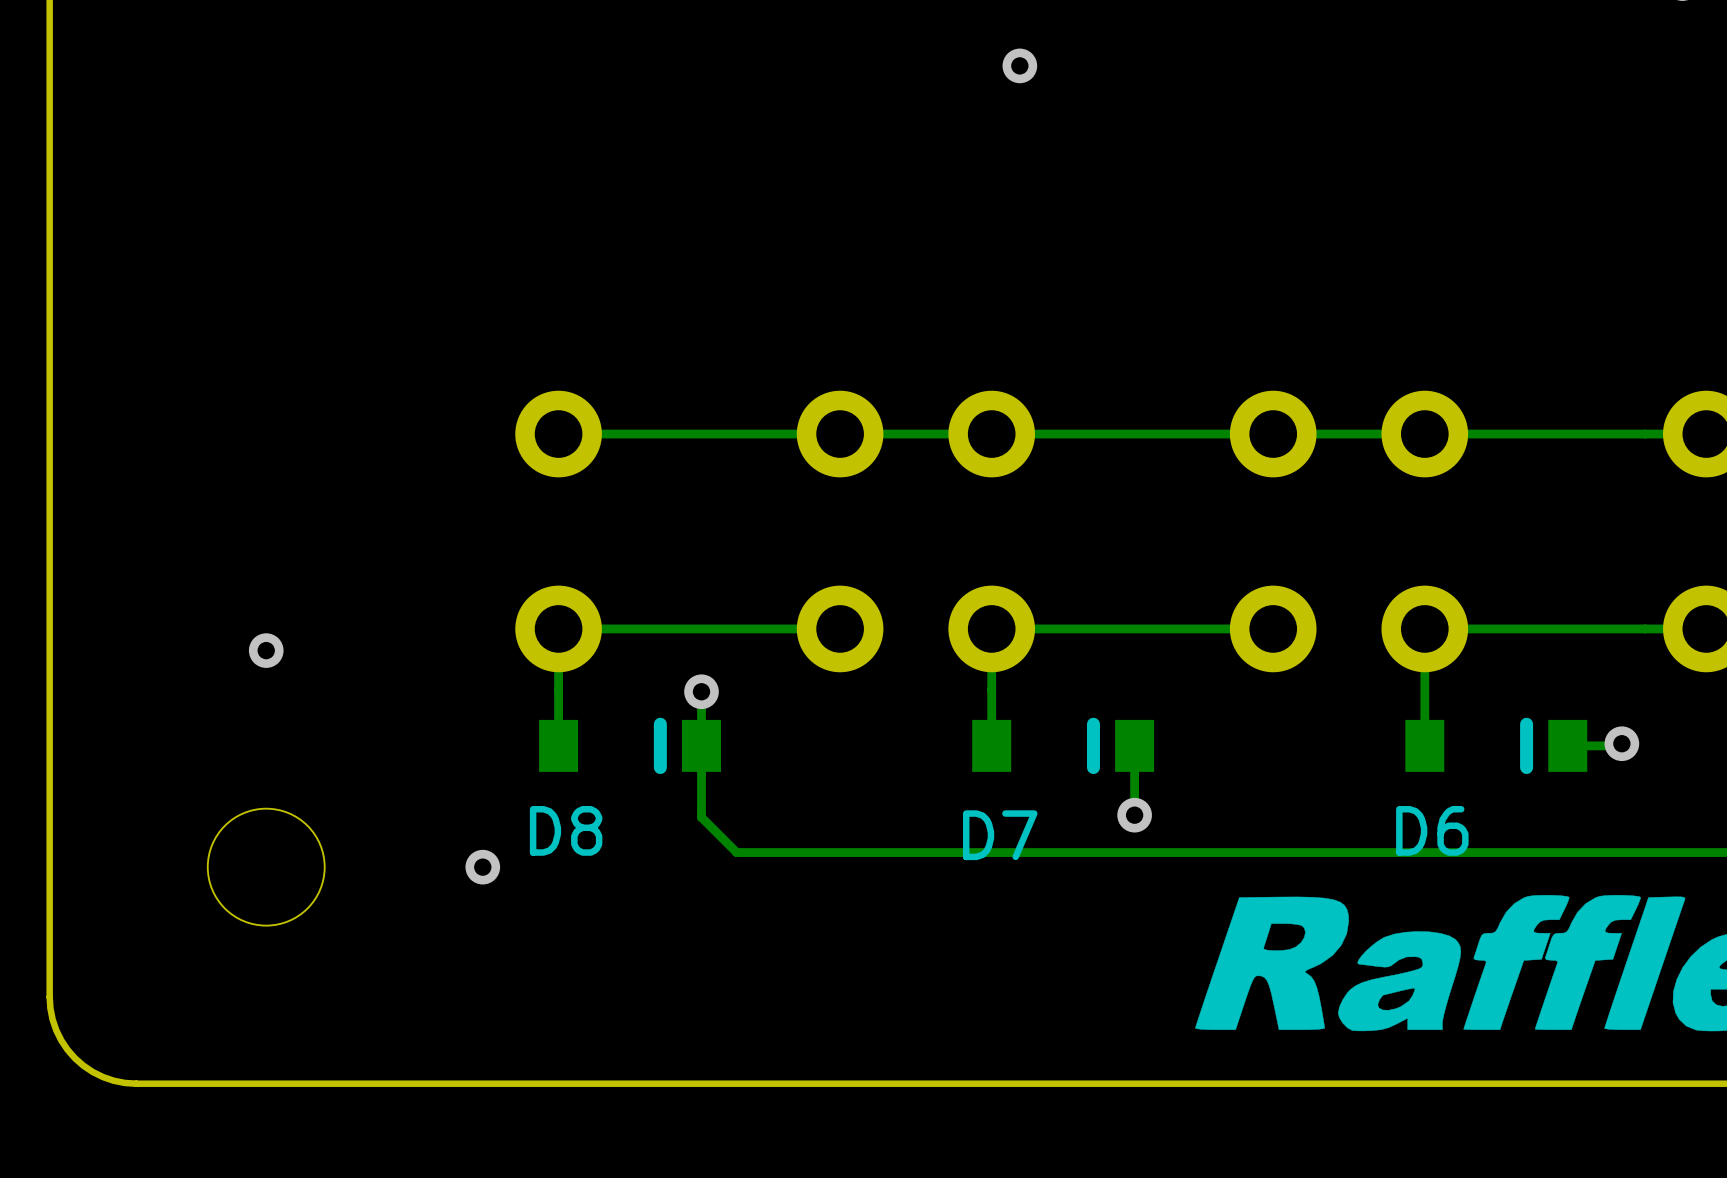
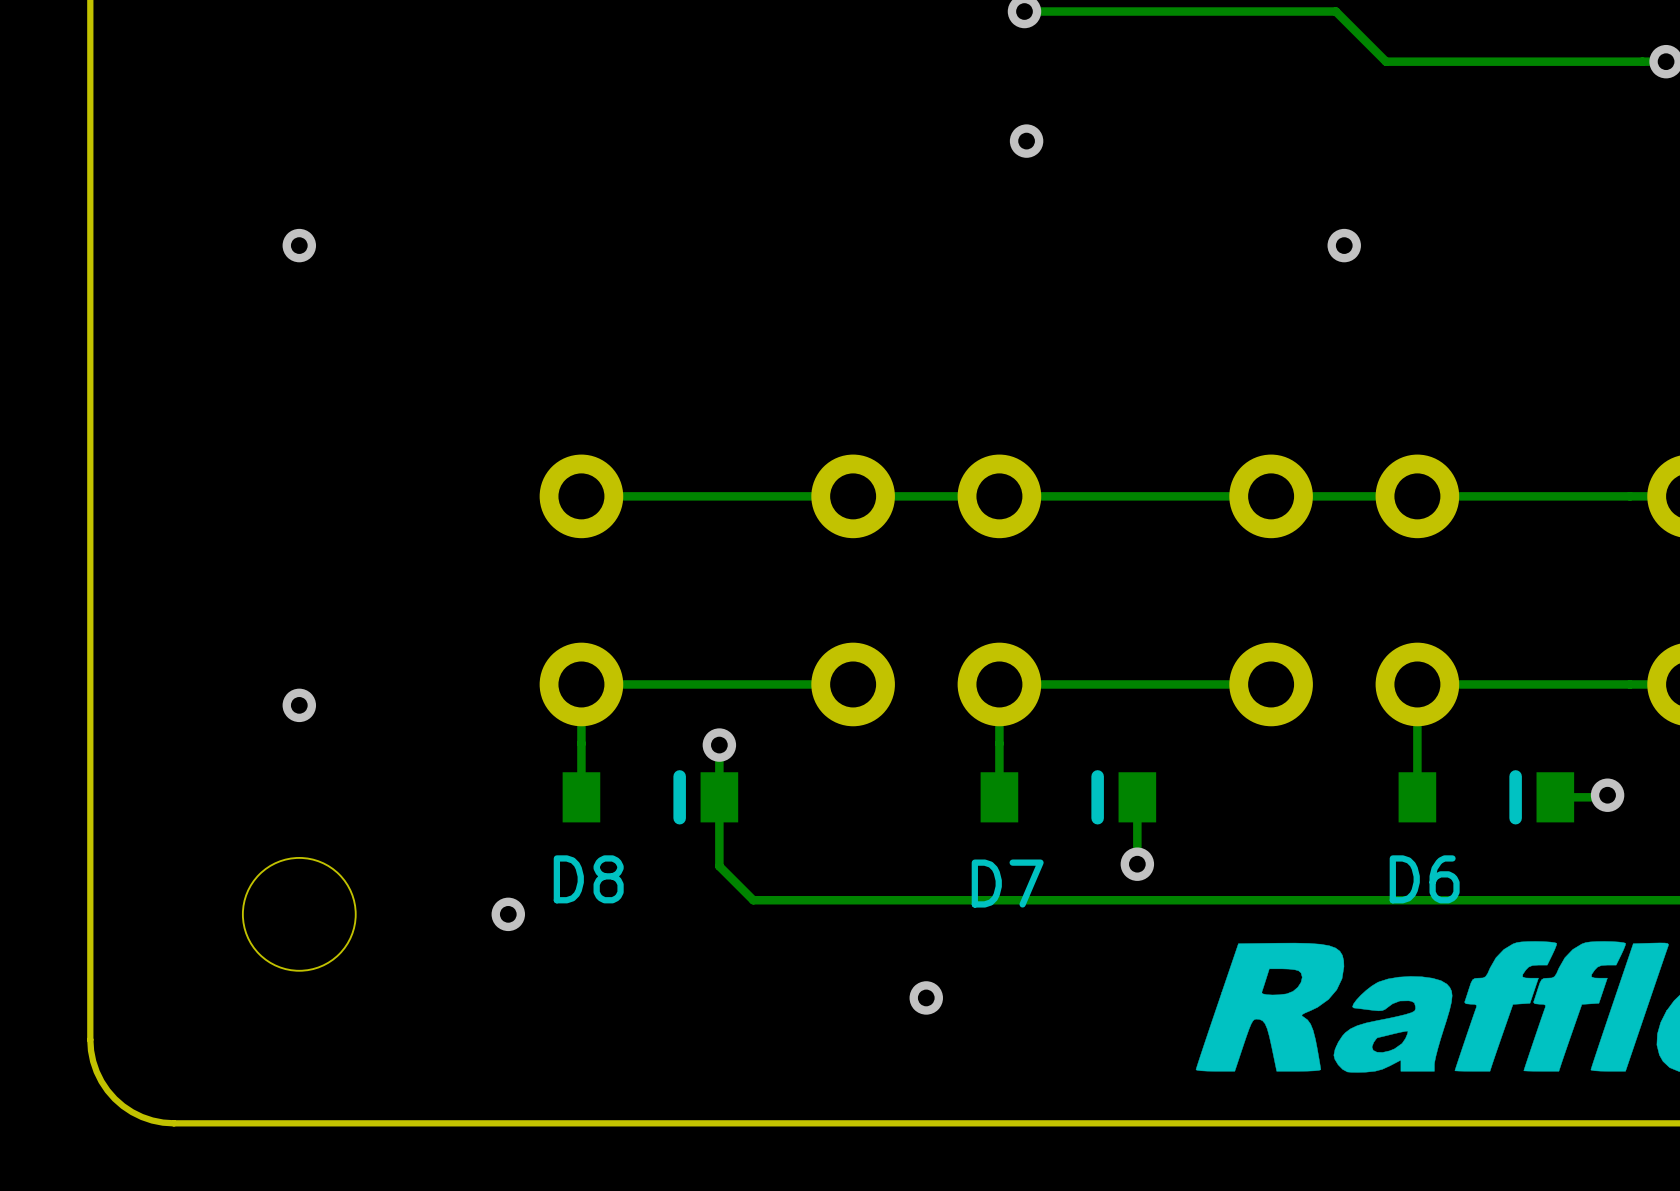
via: none -> (299, 245)
via: none -> (1344, 245)
via: none -> (926, 997)

